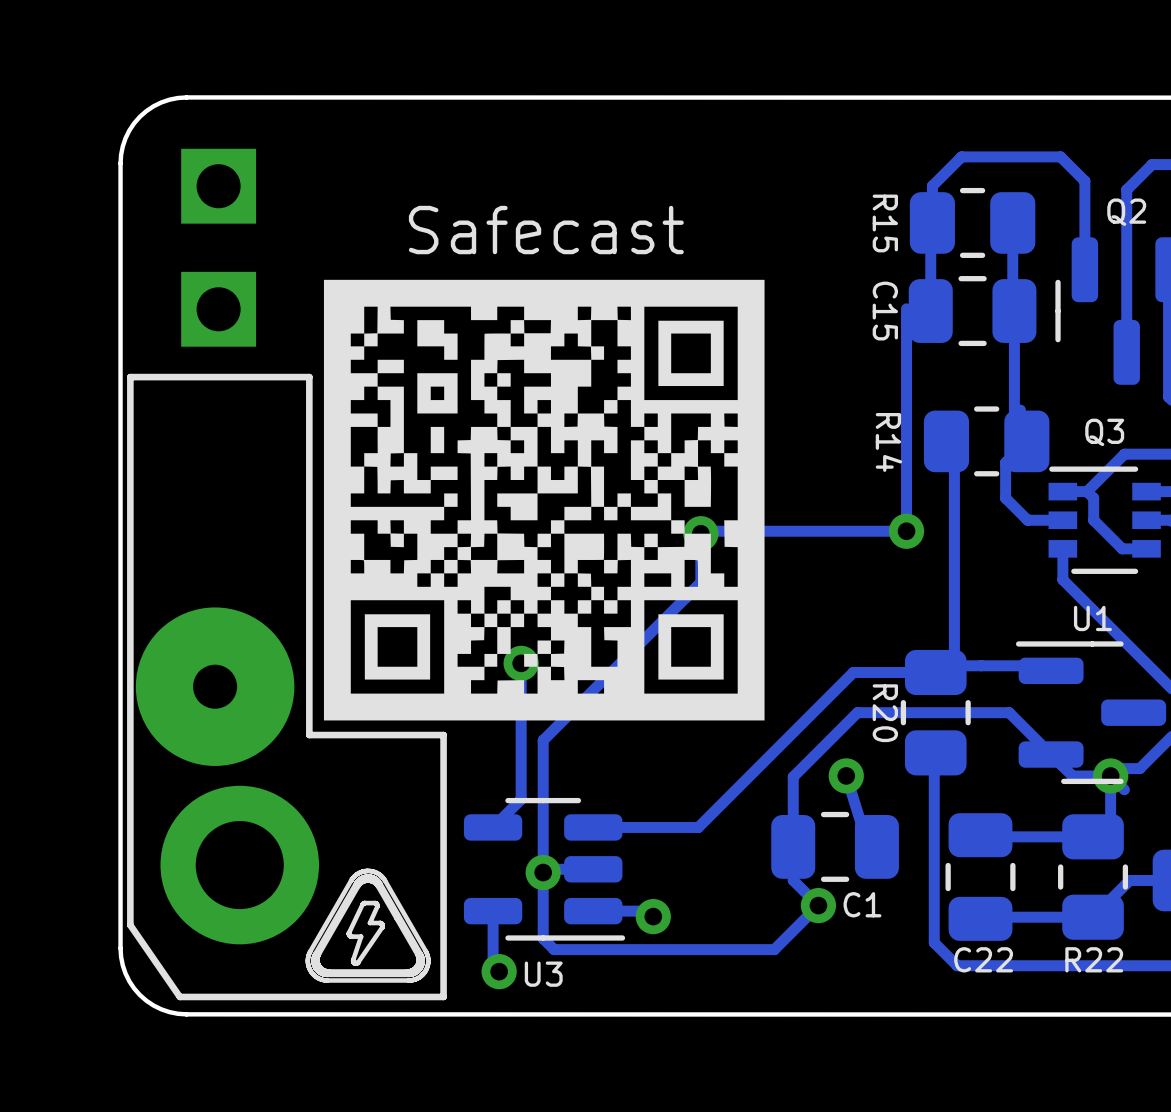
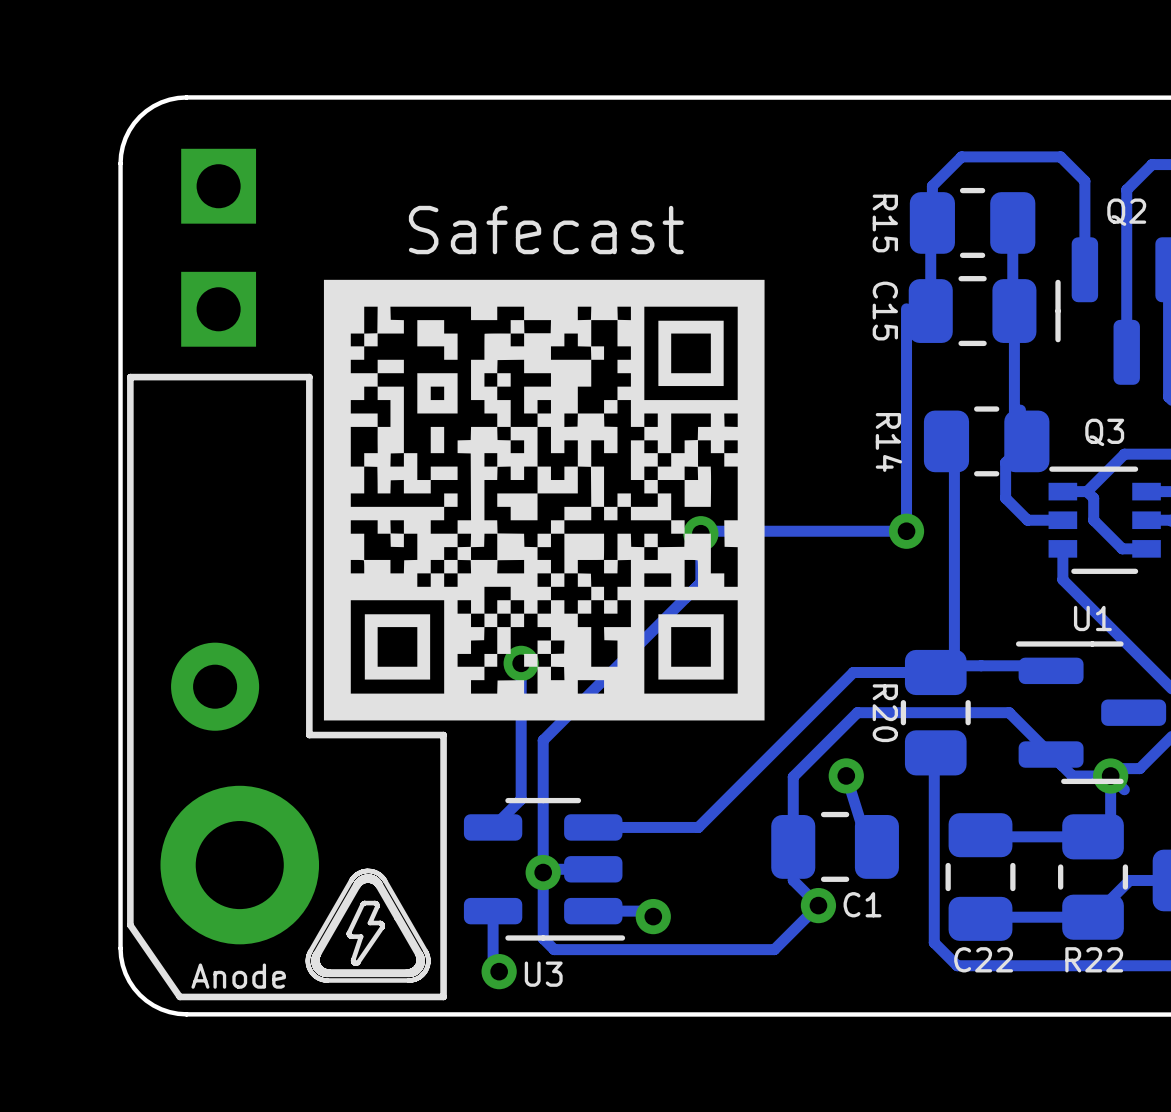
part footprint: [135, 607, 295, 766] -> [171, 642, 260, 731]
part value: none -> Anode (238, 976)

